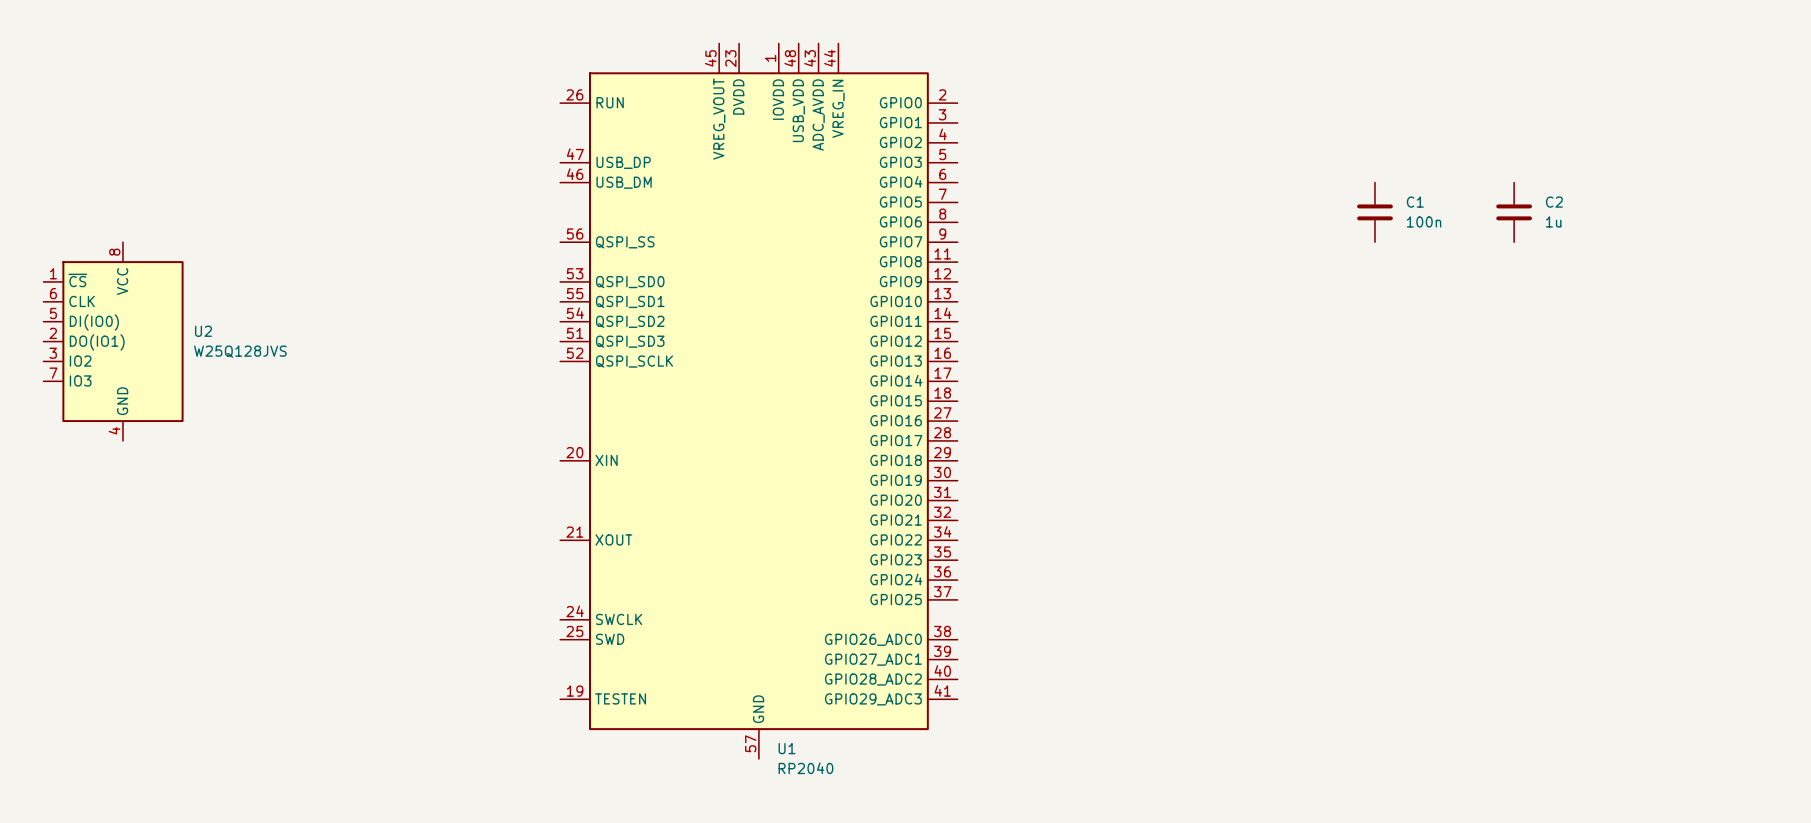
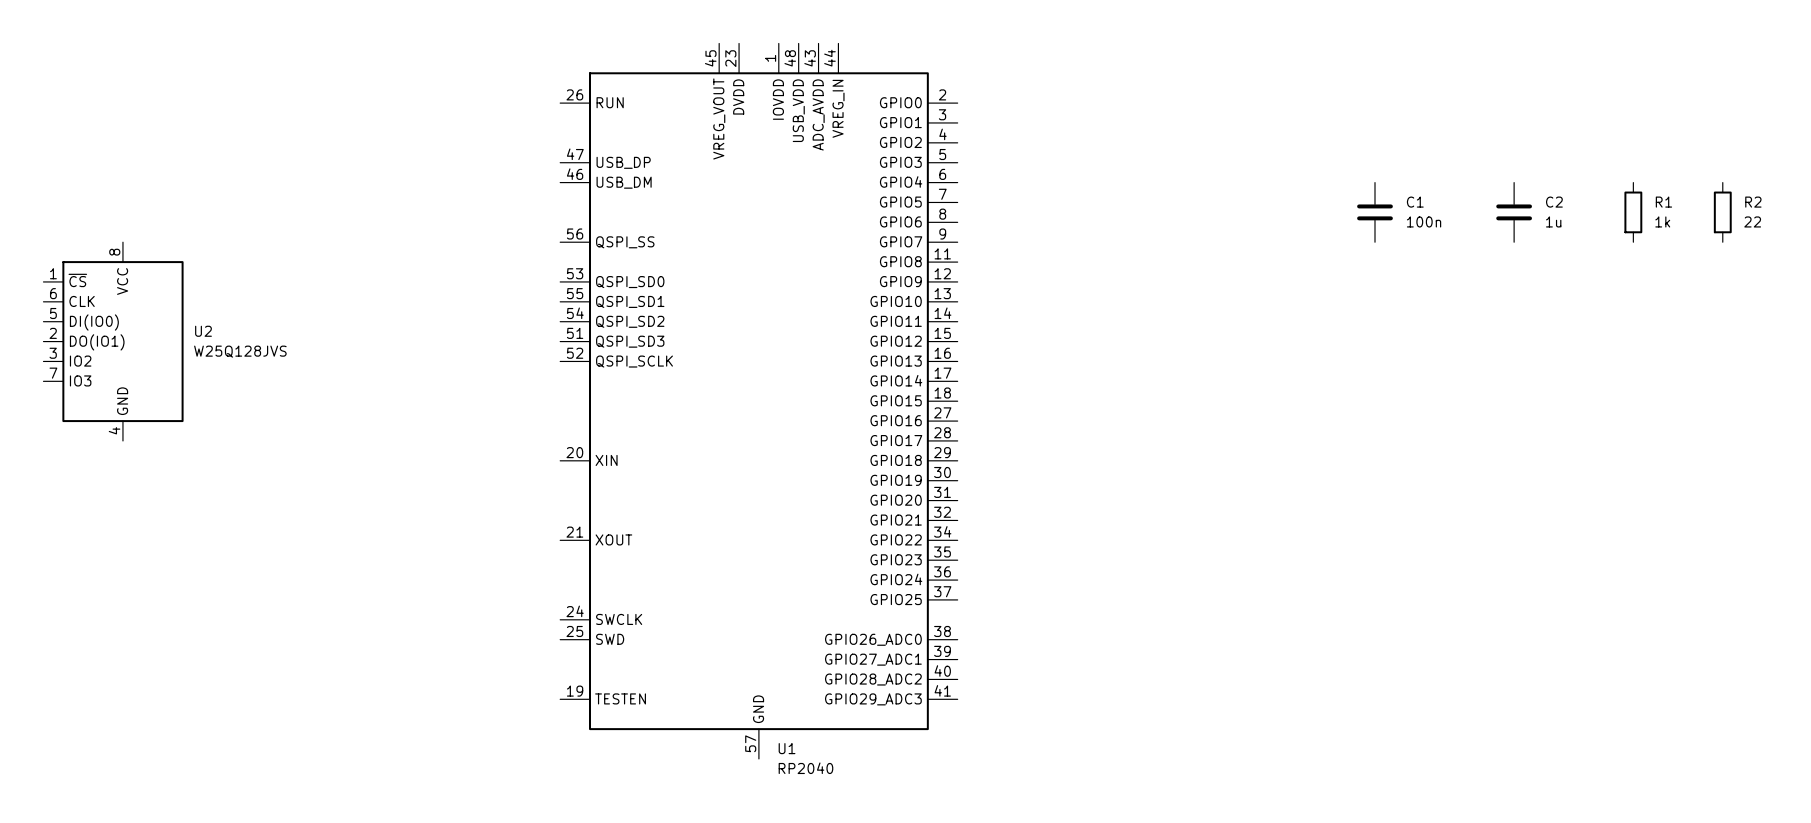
R1: none -> 1k (1633, 212)
R2: none -> 22 (1722, 212)

